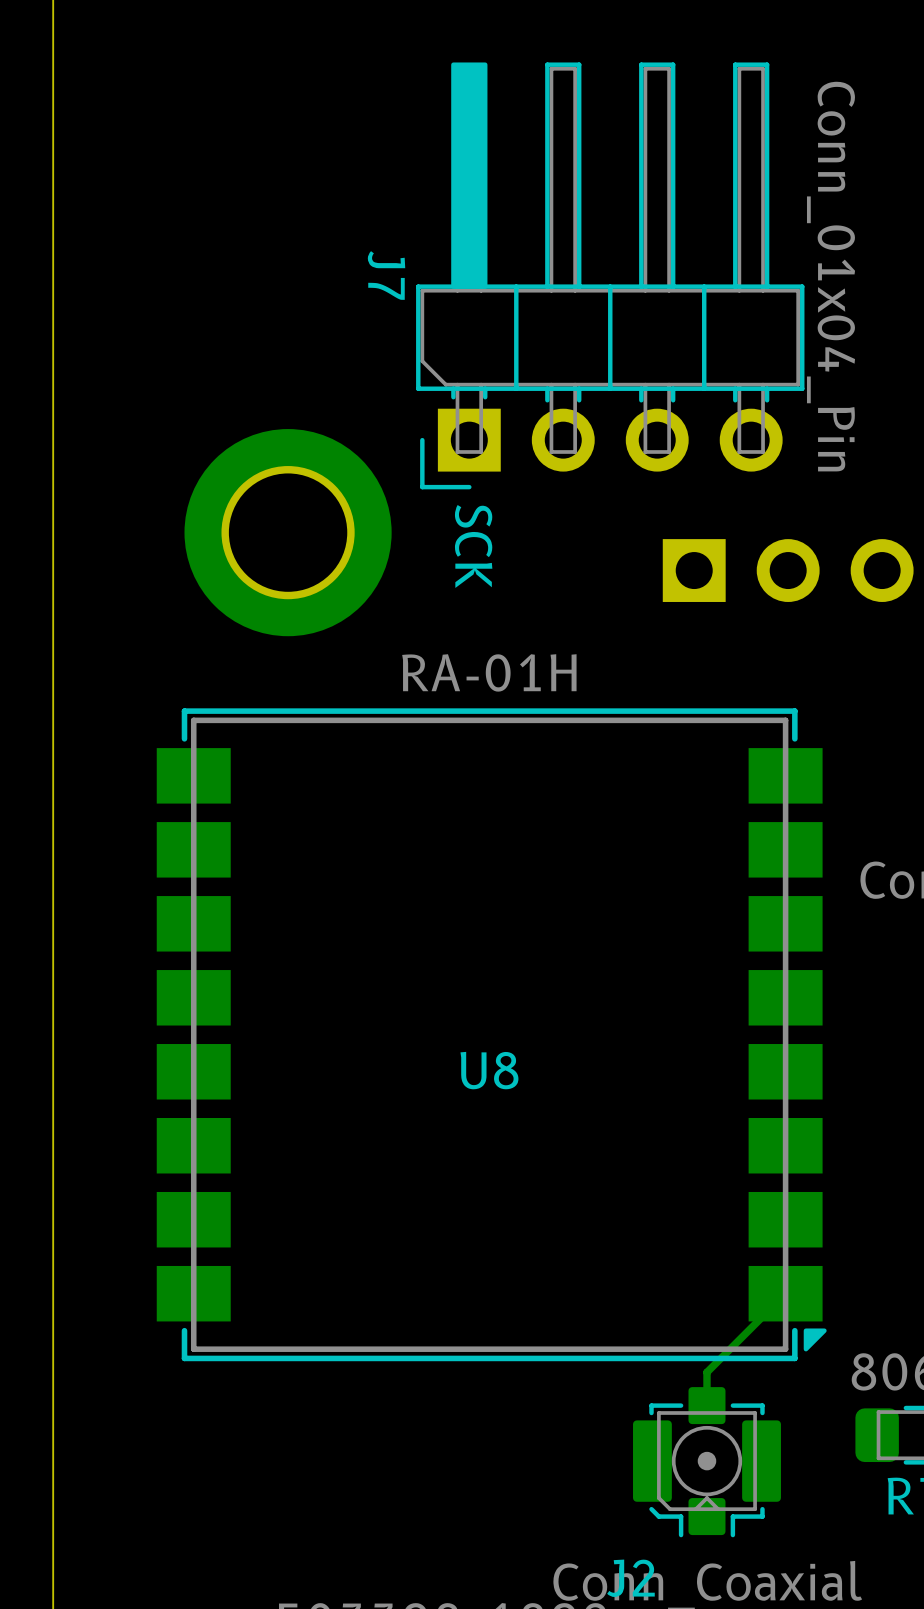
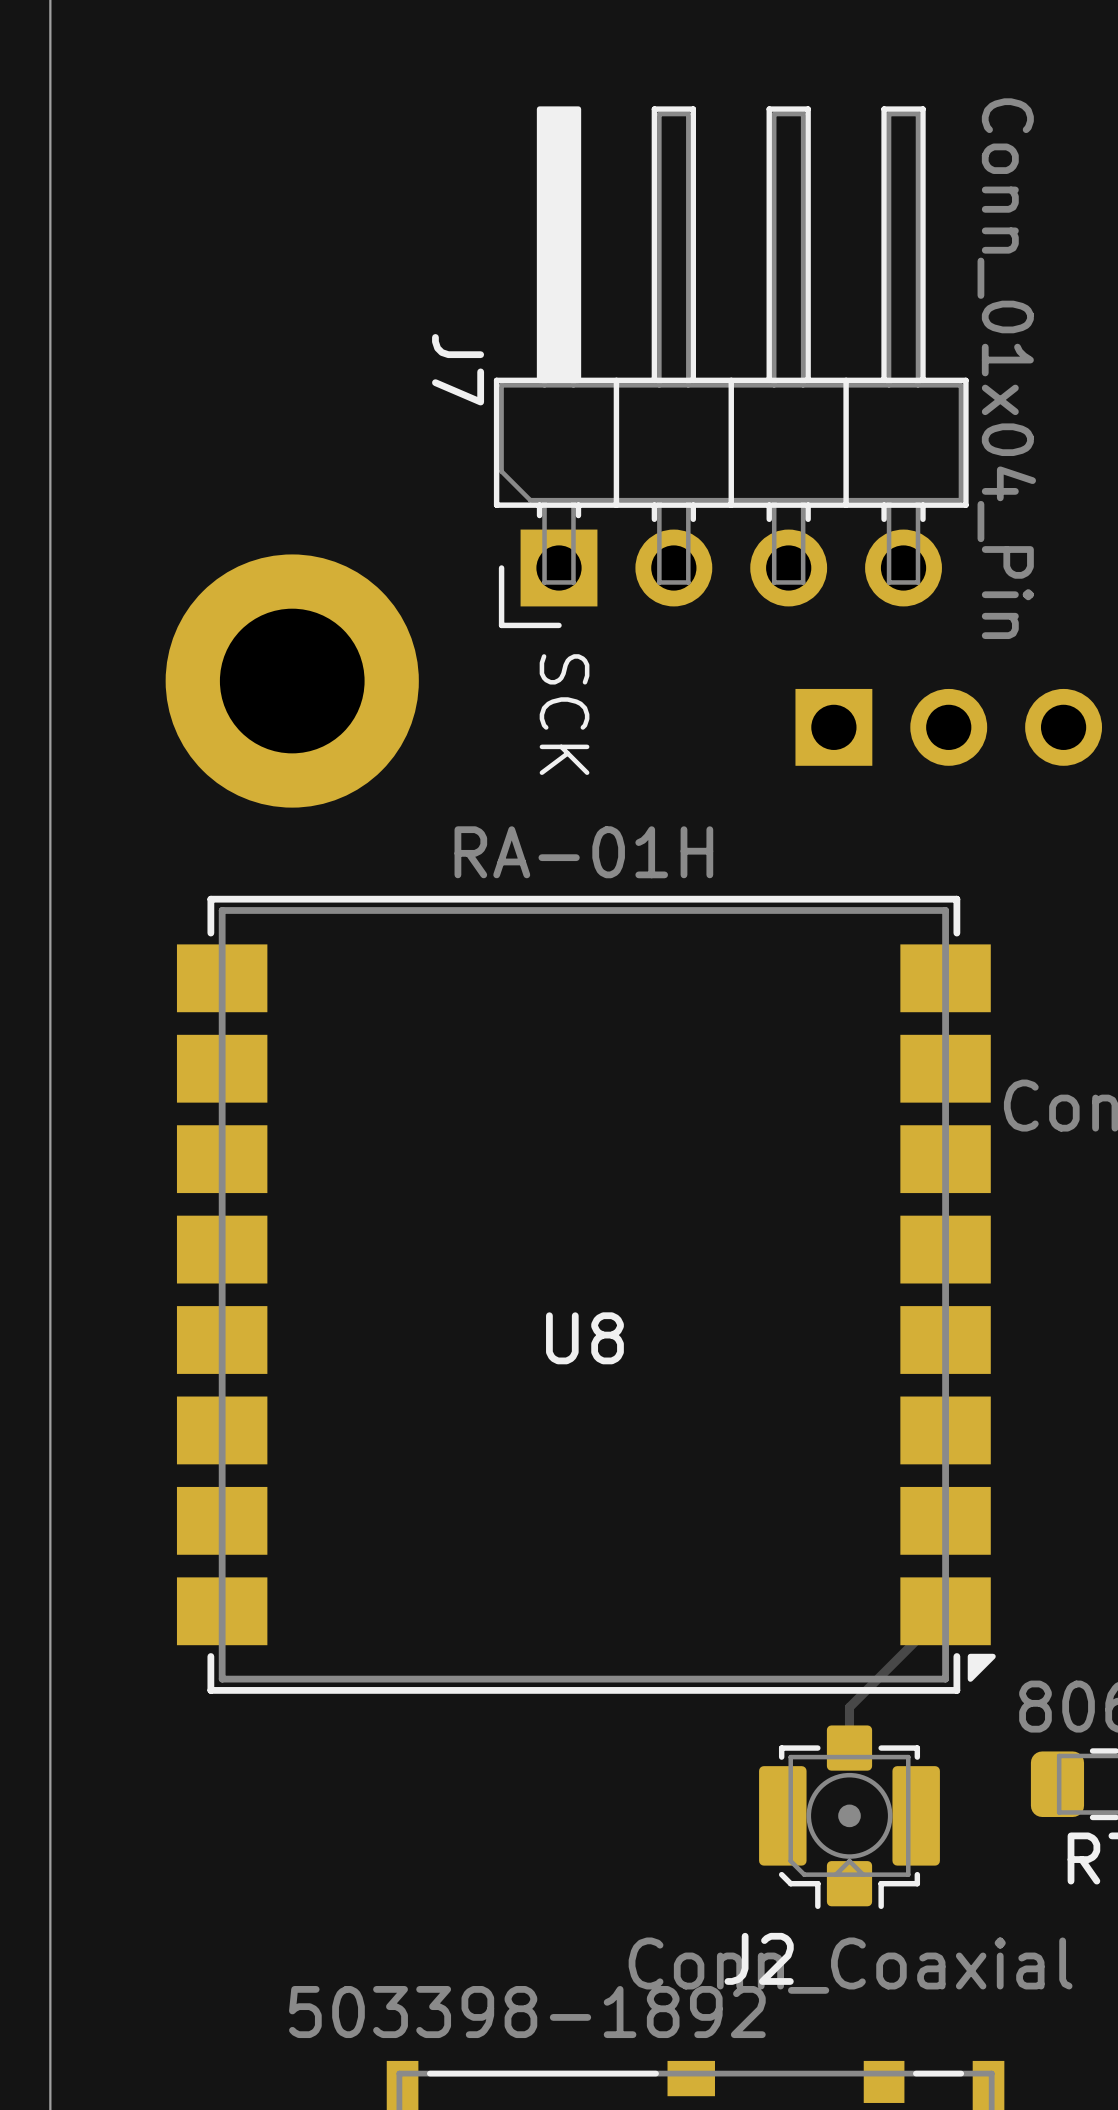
part position: (288, 532) -> (292, 681)

